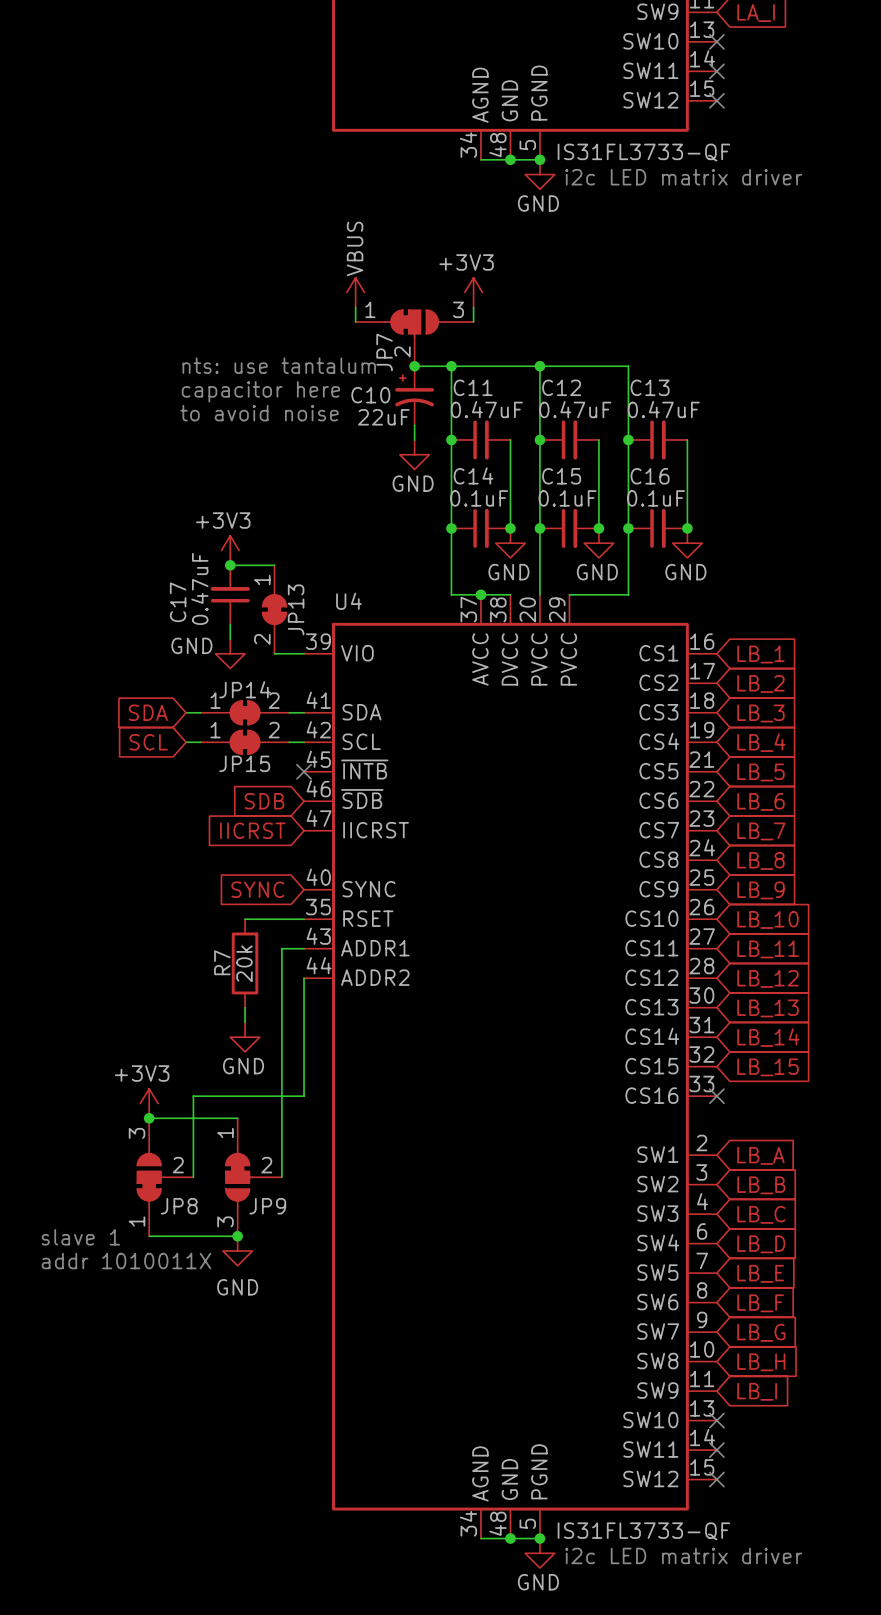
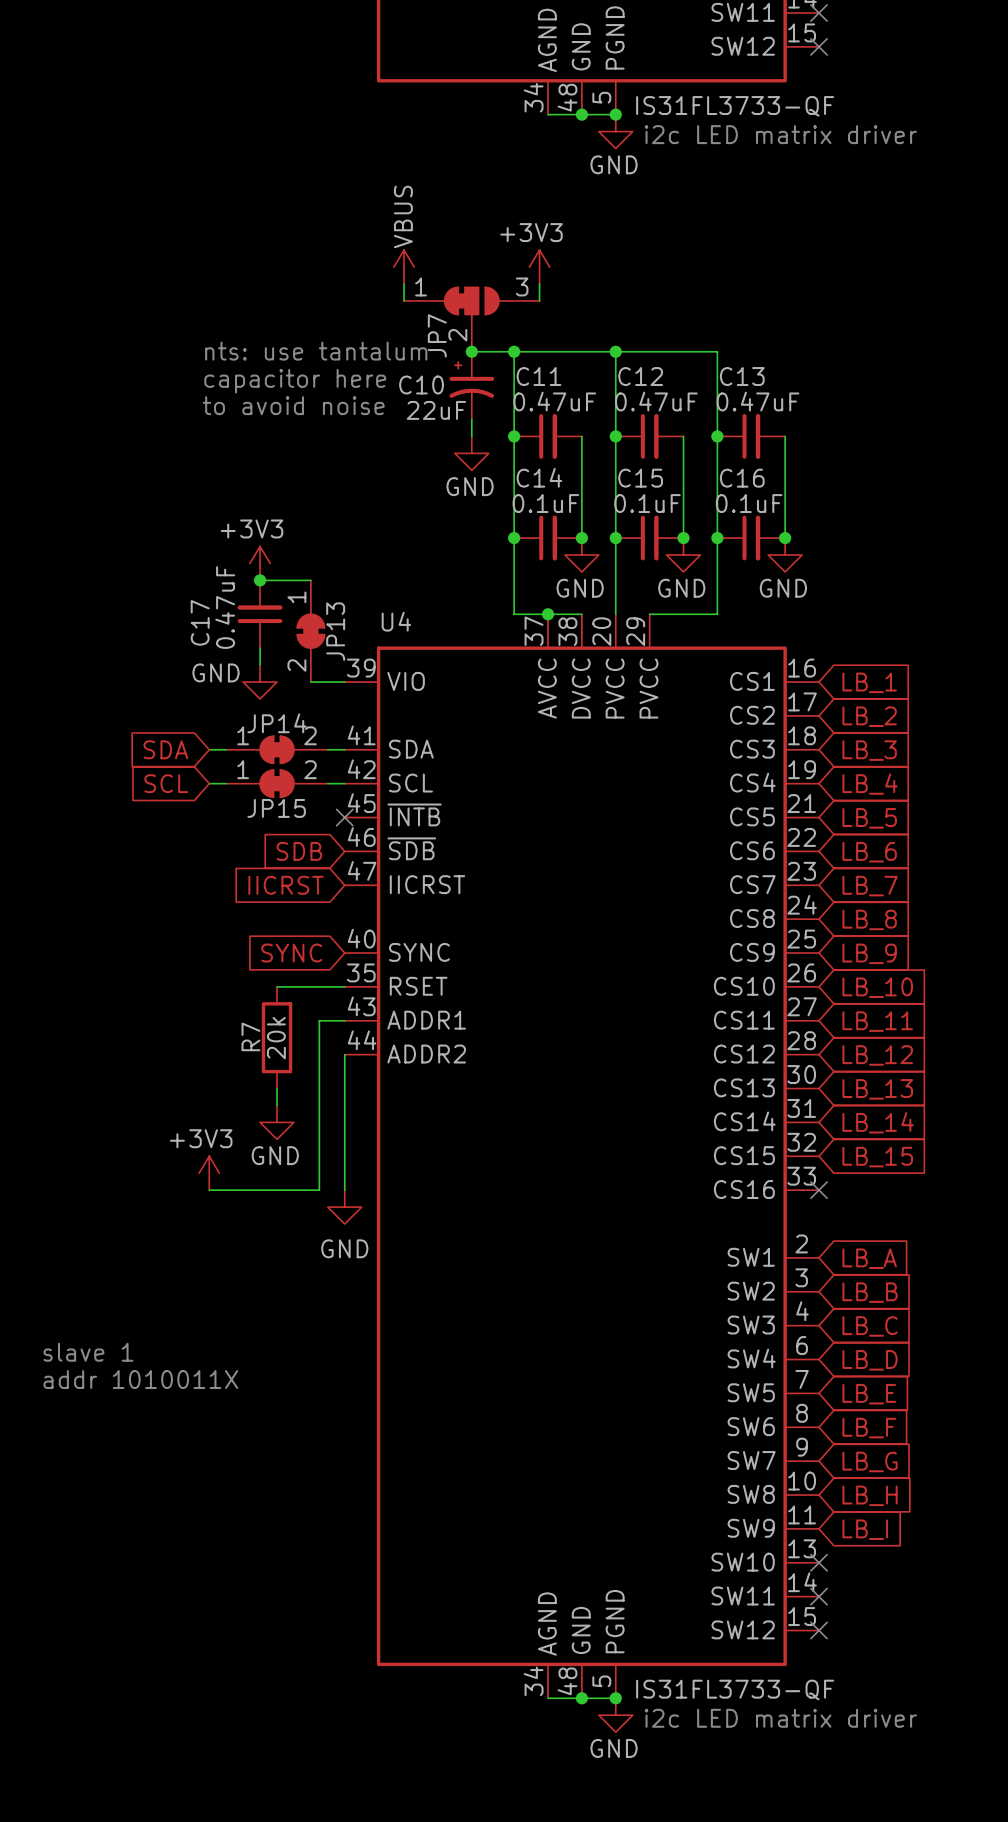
wire: (193, 1096) (193, 1177) -> (217, 1190) (209, 1190)
wire: (304, 1096) (281, 1096) (281, 1177) -> none
power symbol position: +3V3 (149, 1103) -> +3V3 (209, 1173)
wire: (149, 1118) (237, 1118) -> none
junction: (149, 1118) -> none
JP8: (165, 1177) -> none
JP9: (253, 1177) -> none
wire: (149, 1236) (237, 1236) -> none
junction: (237, 1236) -> none
power symbol position: GND (237, 1251) -> GND (344, 1207)

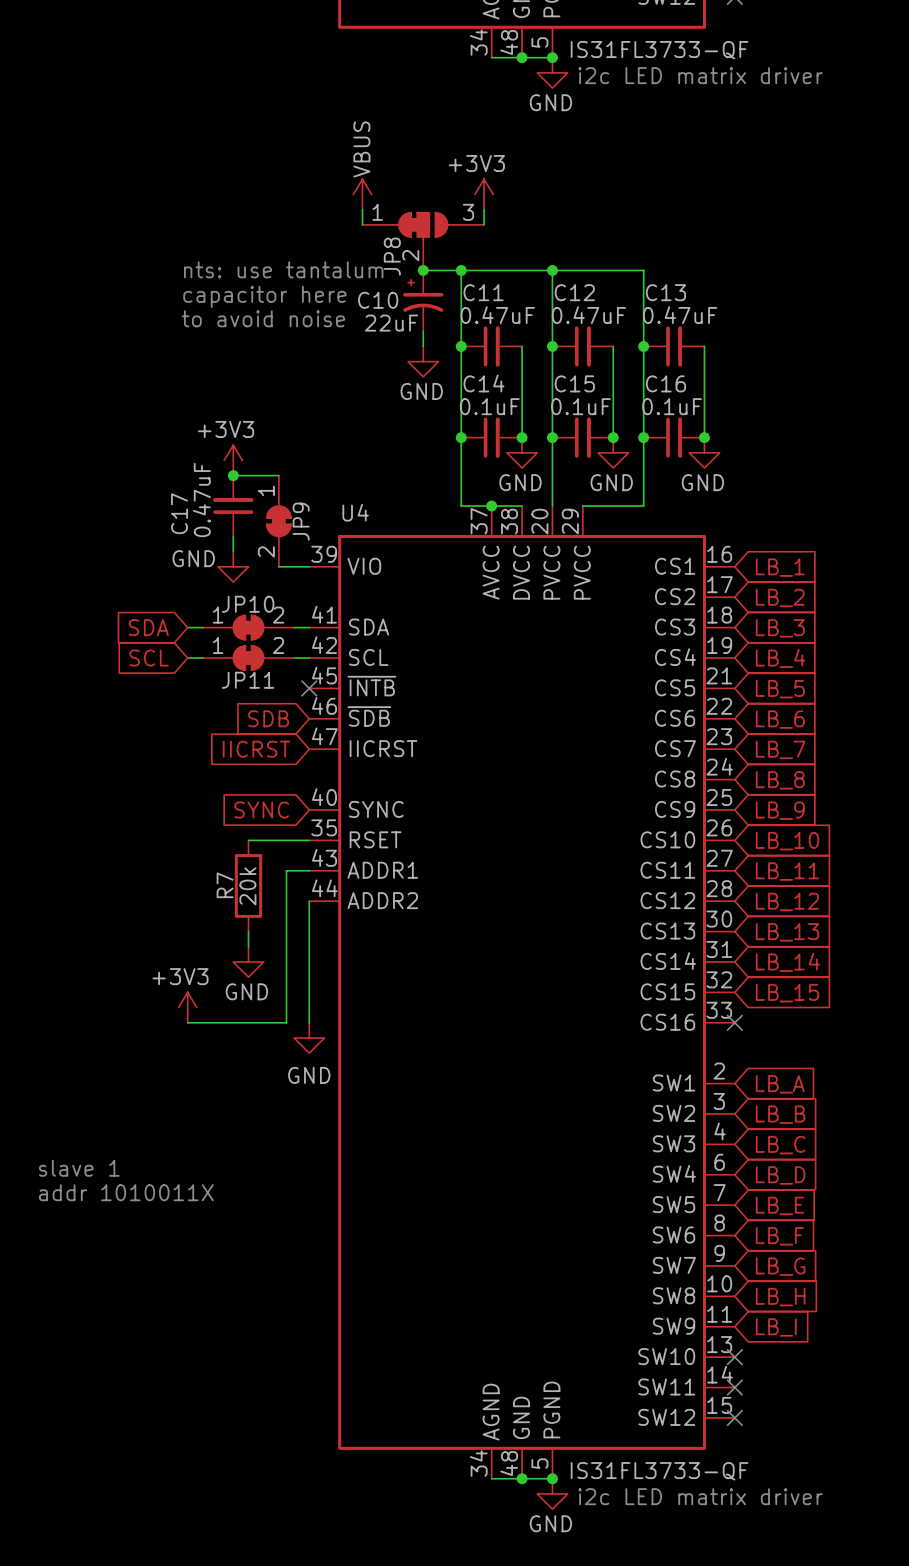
JP7 name: JP7 (437, 335) -> JP8 (392, 256)
JP13 name: JP13 (335, 631) -> JP9 (301, 521)
JP14 name: JP14 (277, 723) -> JP10 (248, 604)
JP15 name: JP15 (276, 808) -> JP11 (248, 680)

